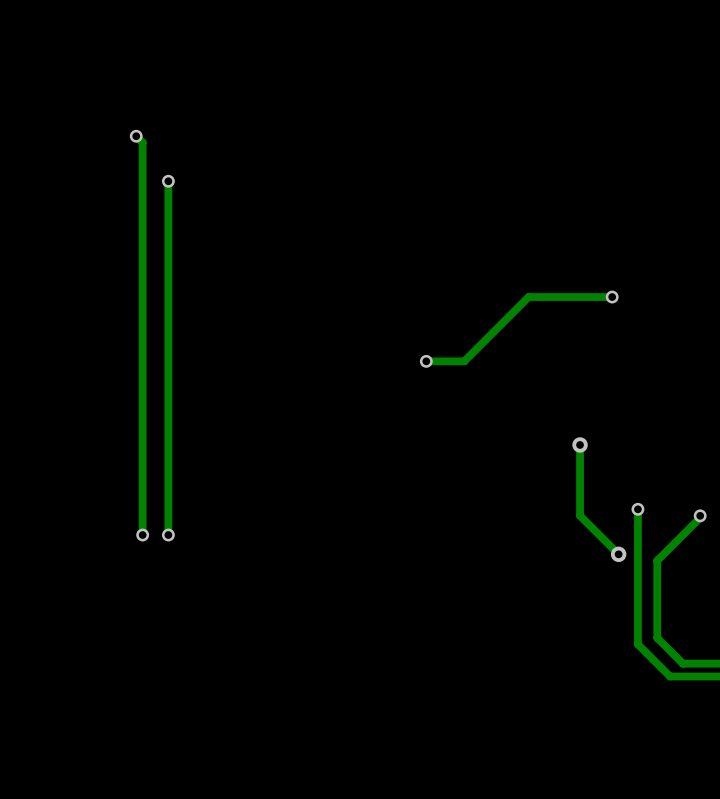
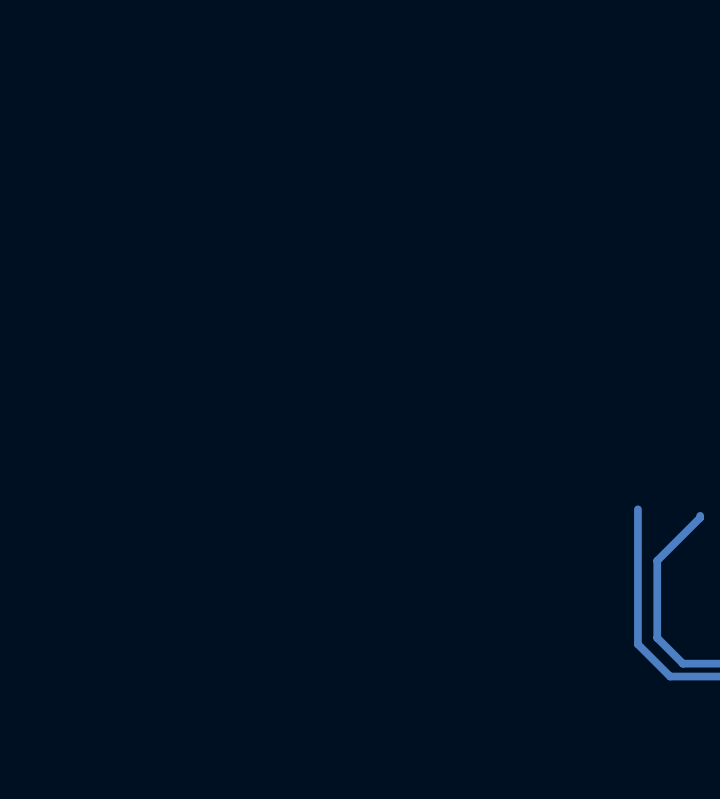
track: (136, 136) (142, 142) (142, 535) -> none
via: (136, 136) -> none
track: (168, 181) (168, 535) -> none
via: (168, 181) -> none
track: (612, 297) (528, 297) (464, 361) (426, 361) -> none
via: (612, 297) -> none
via: (426, 361) -> none
track: (580, 444) (580, 515) (618, 554) -> none
via: (580, 444) -> none
via: (637, 509) -> none
via: (700, 515) -> none
via: (142, 535) -> none
via: (168, 535) -> none
via: (618, 554) -> none

